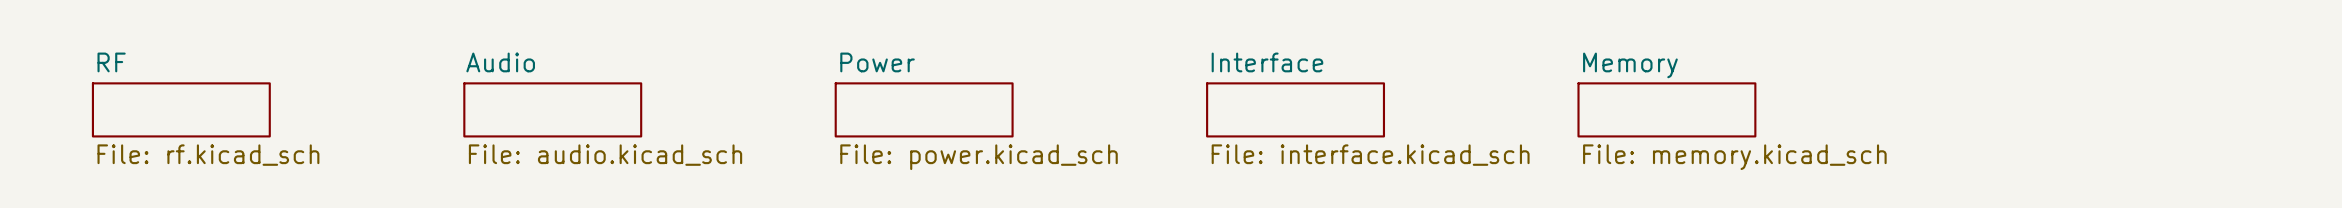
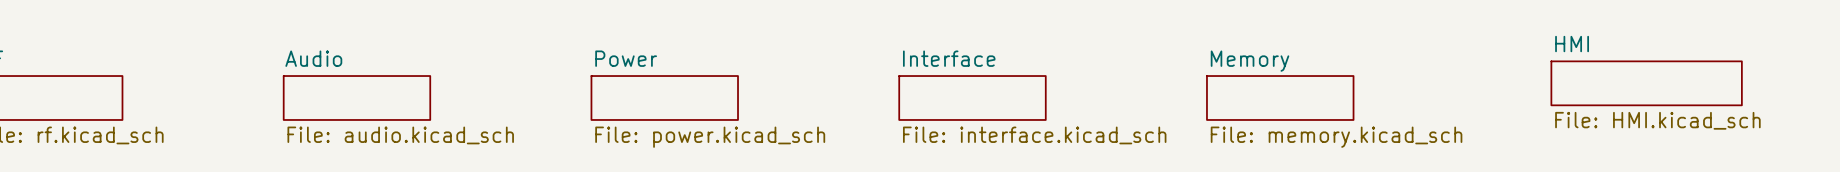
sheet HMI: none -> File: HMI.kicad_sch (1646, 83)

